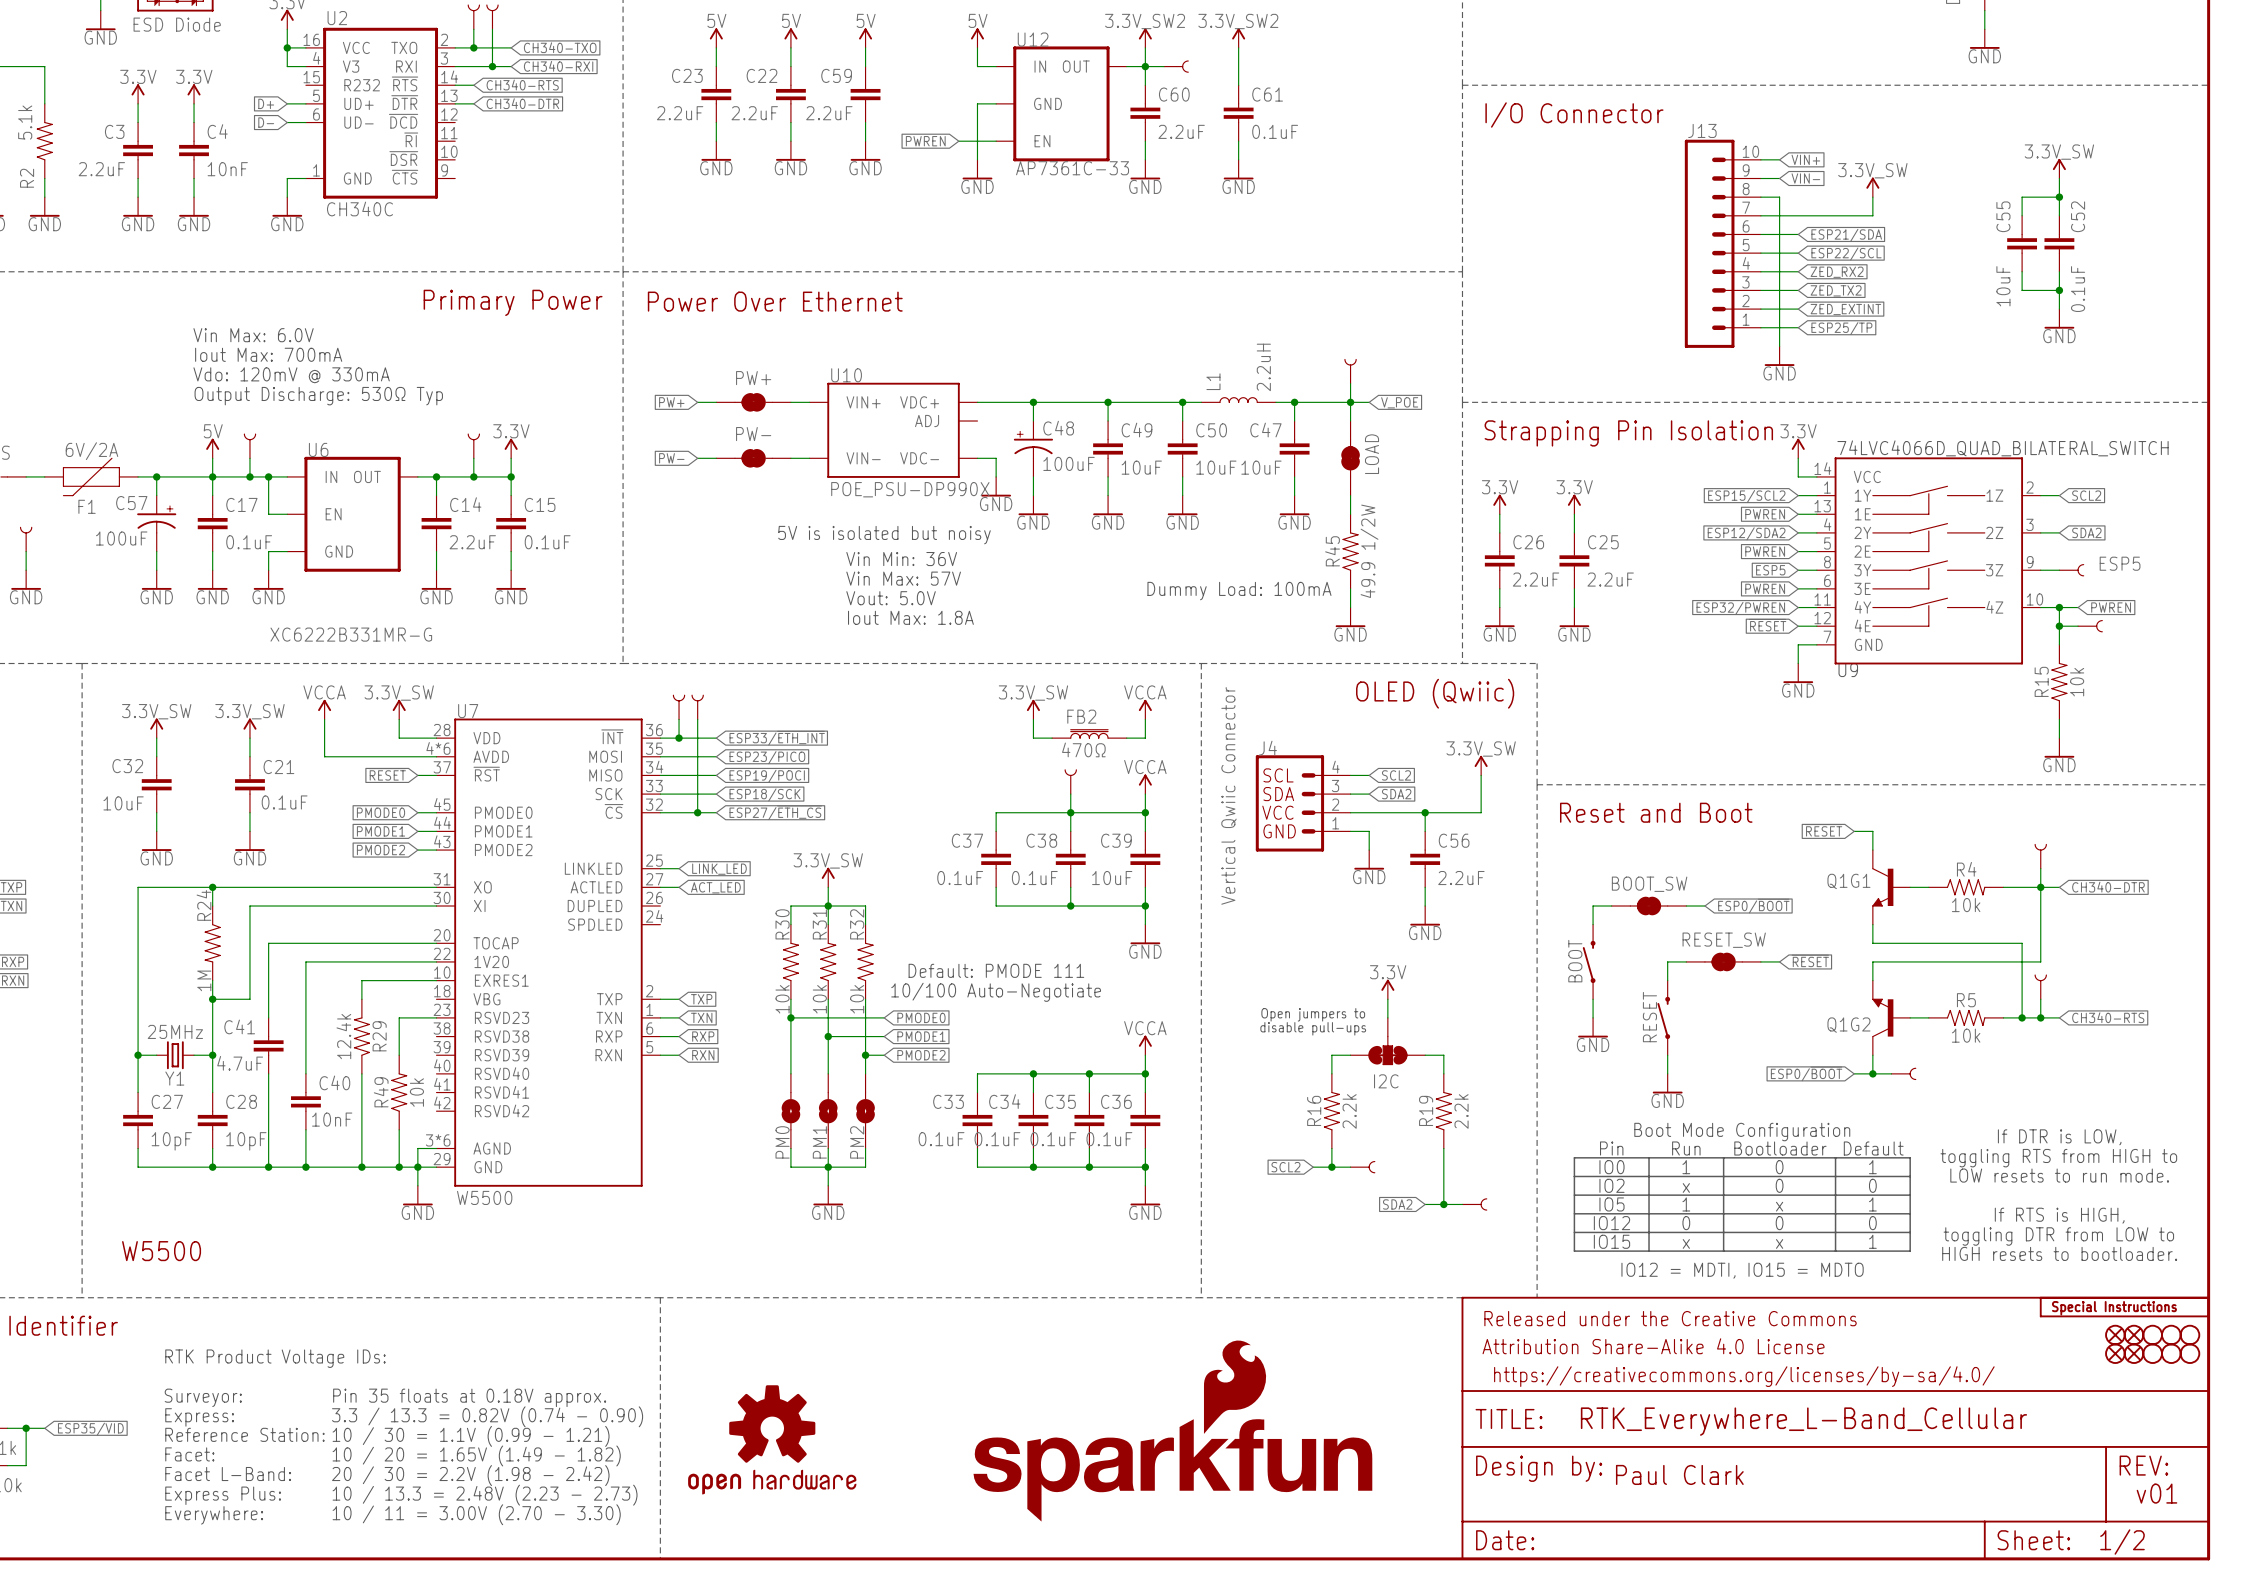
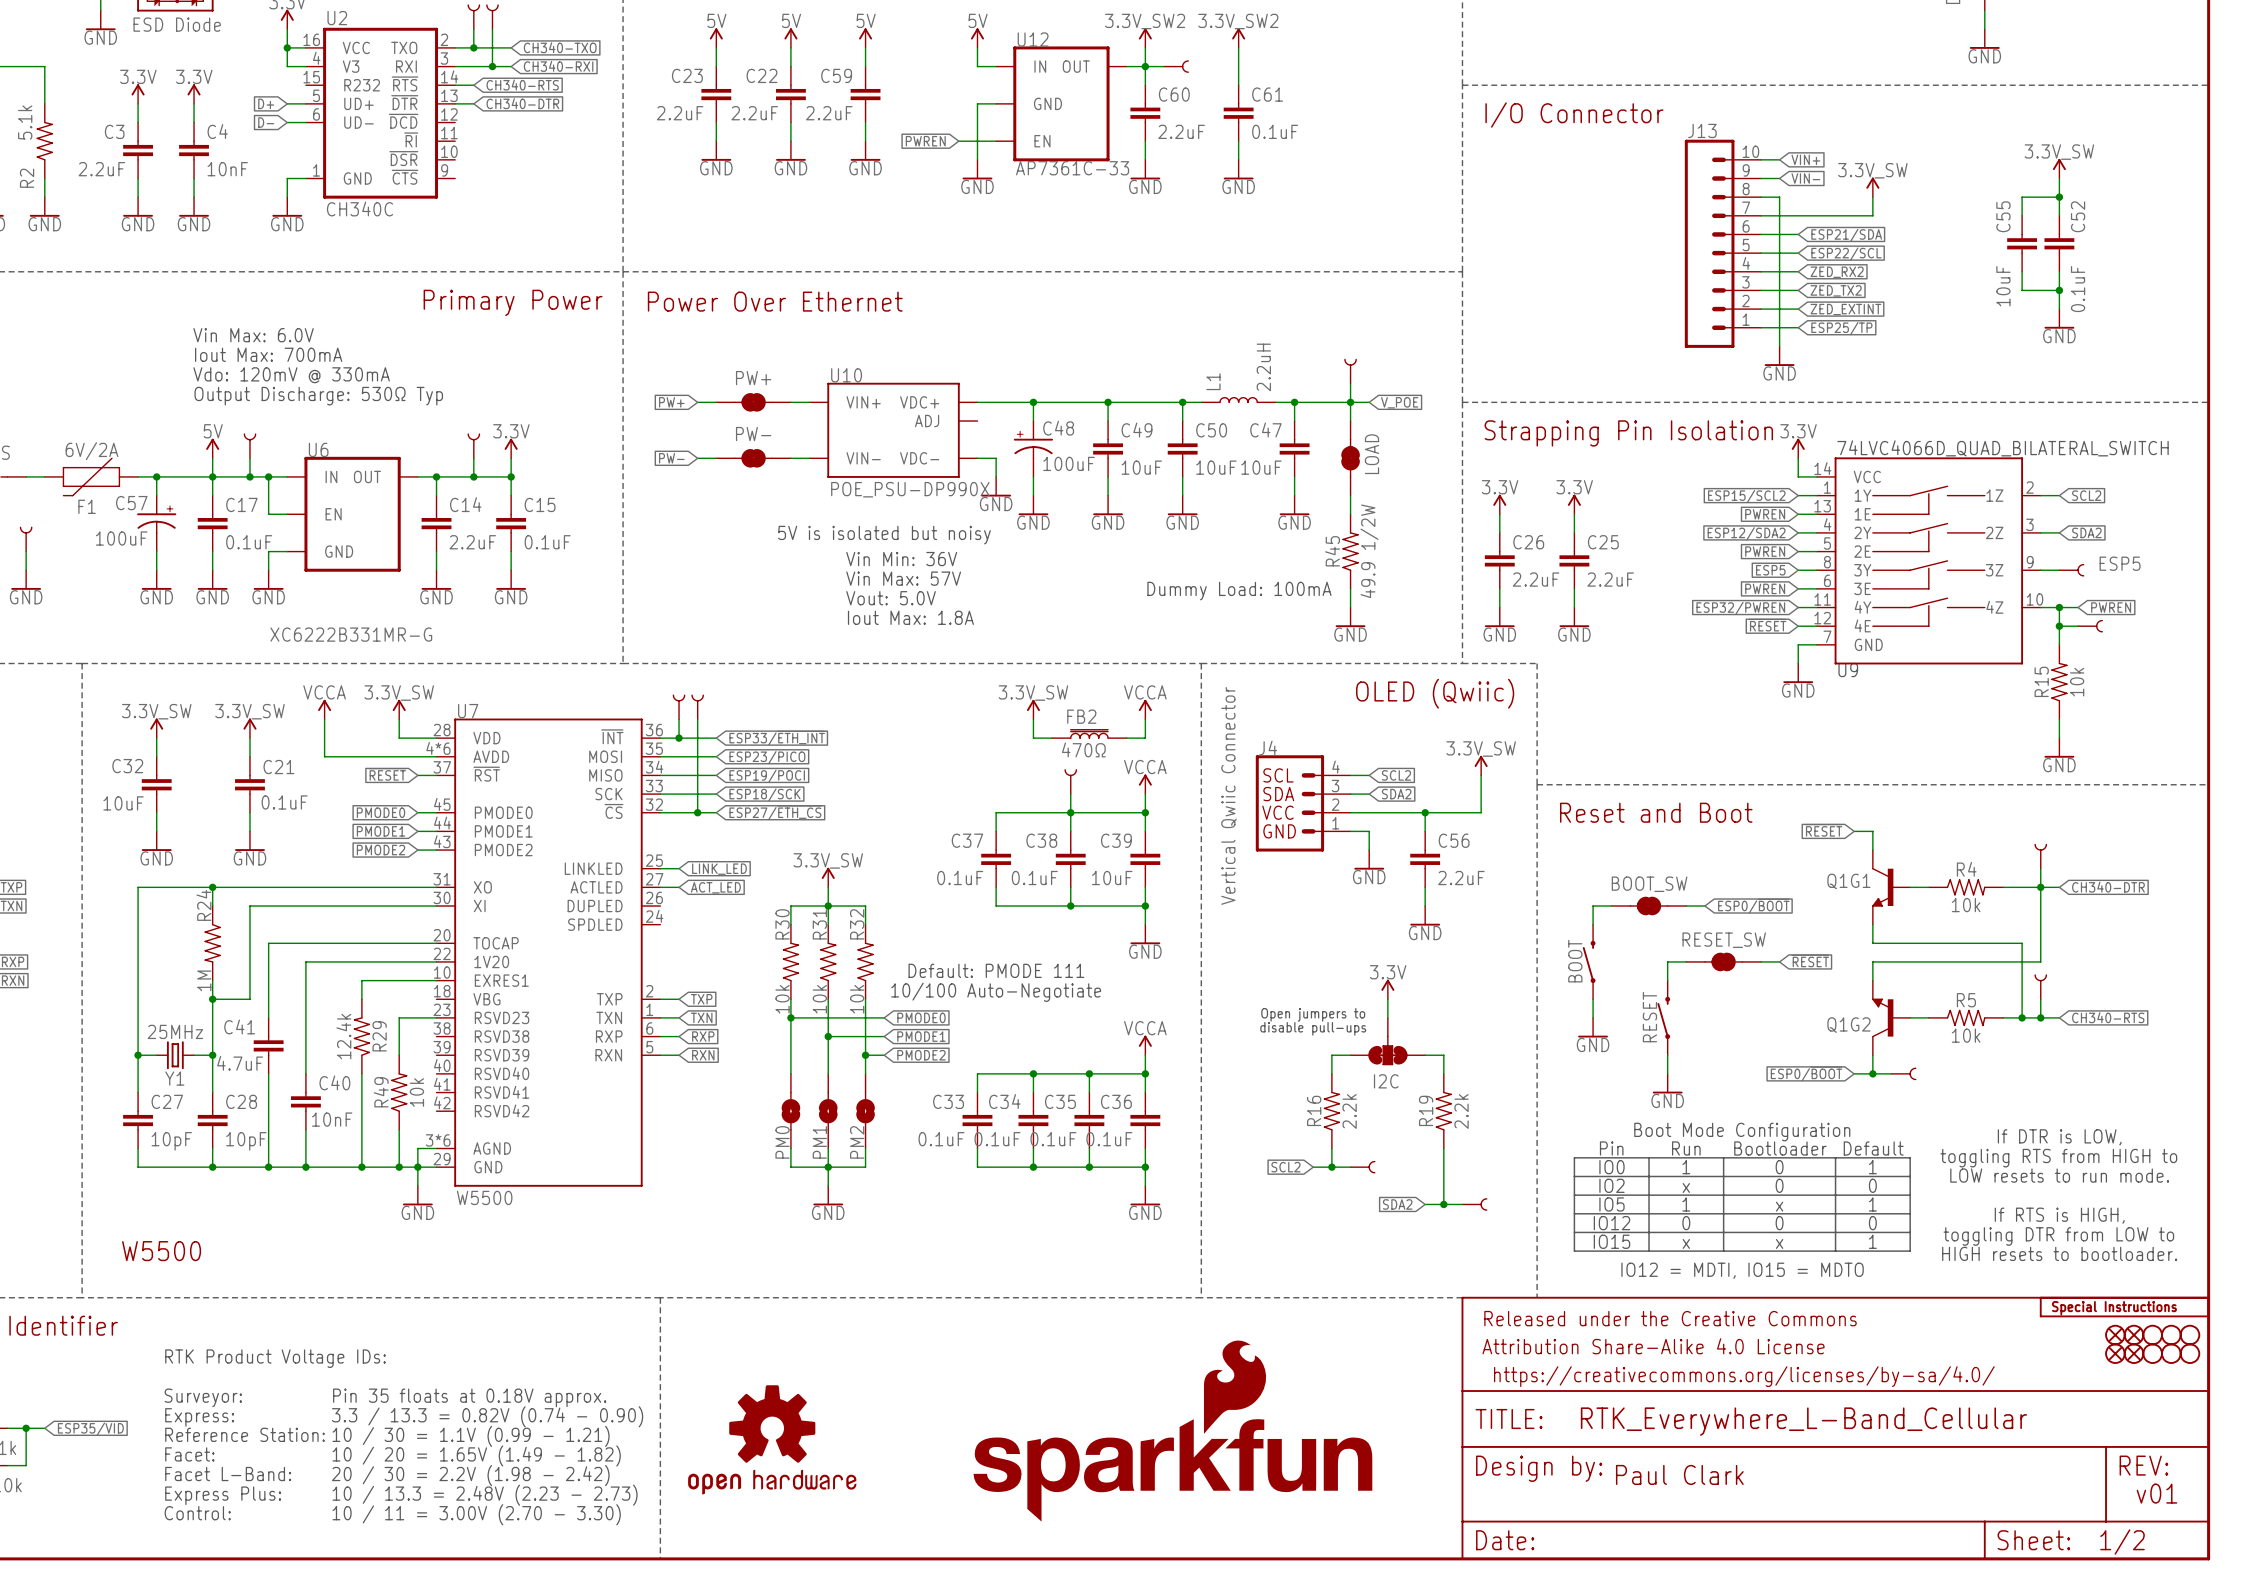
text: Everywhere: (214, 1515) -> Control: (197, 1513)

